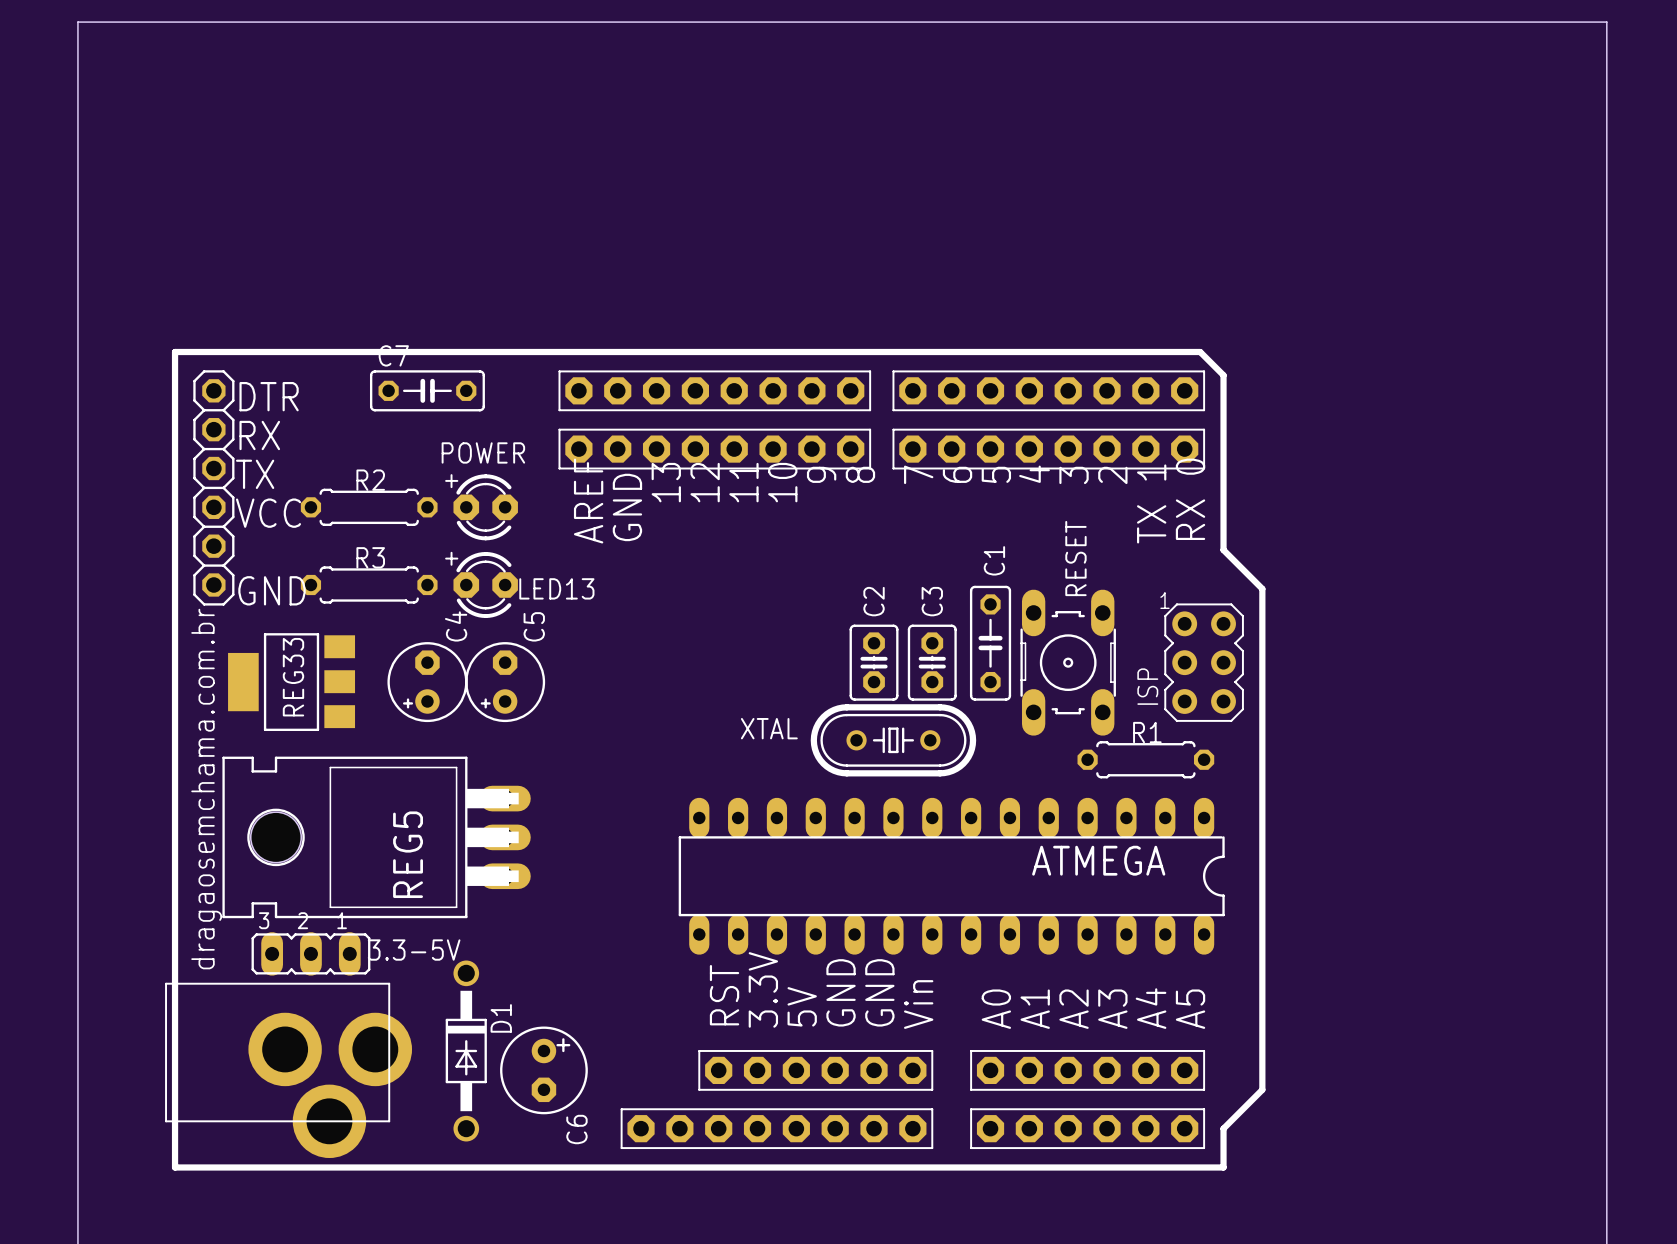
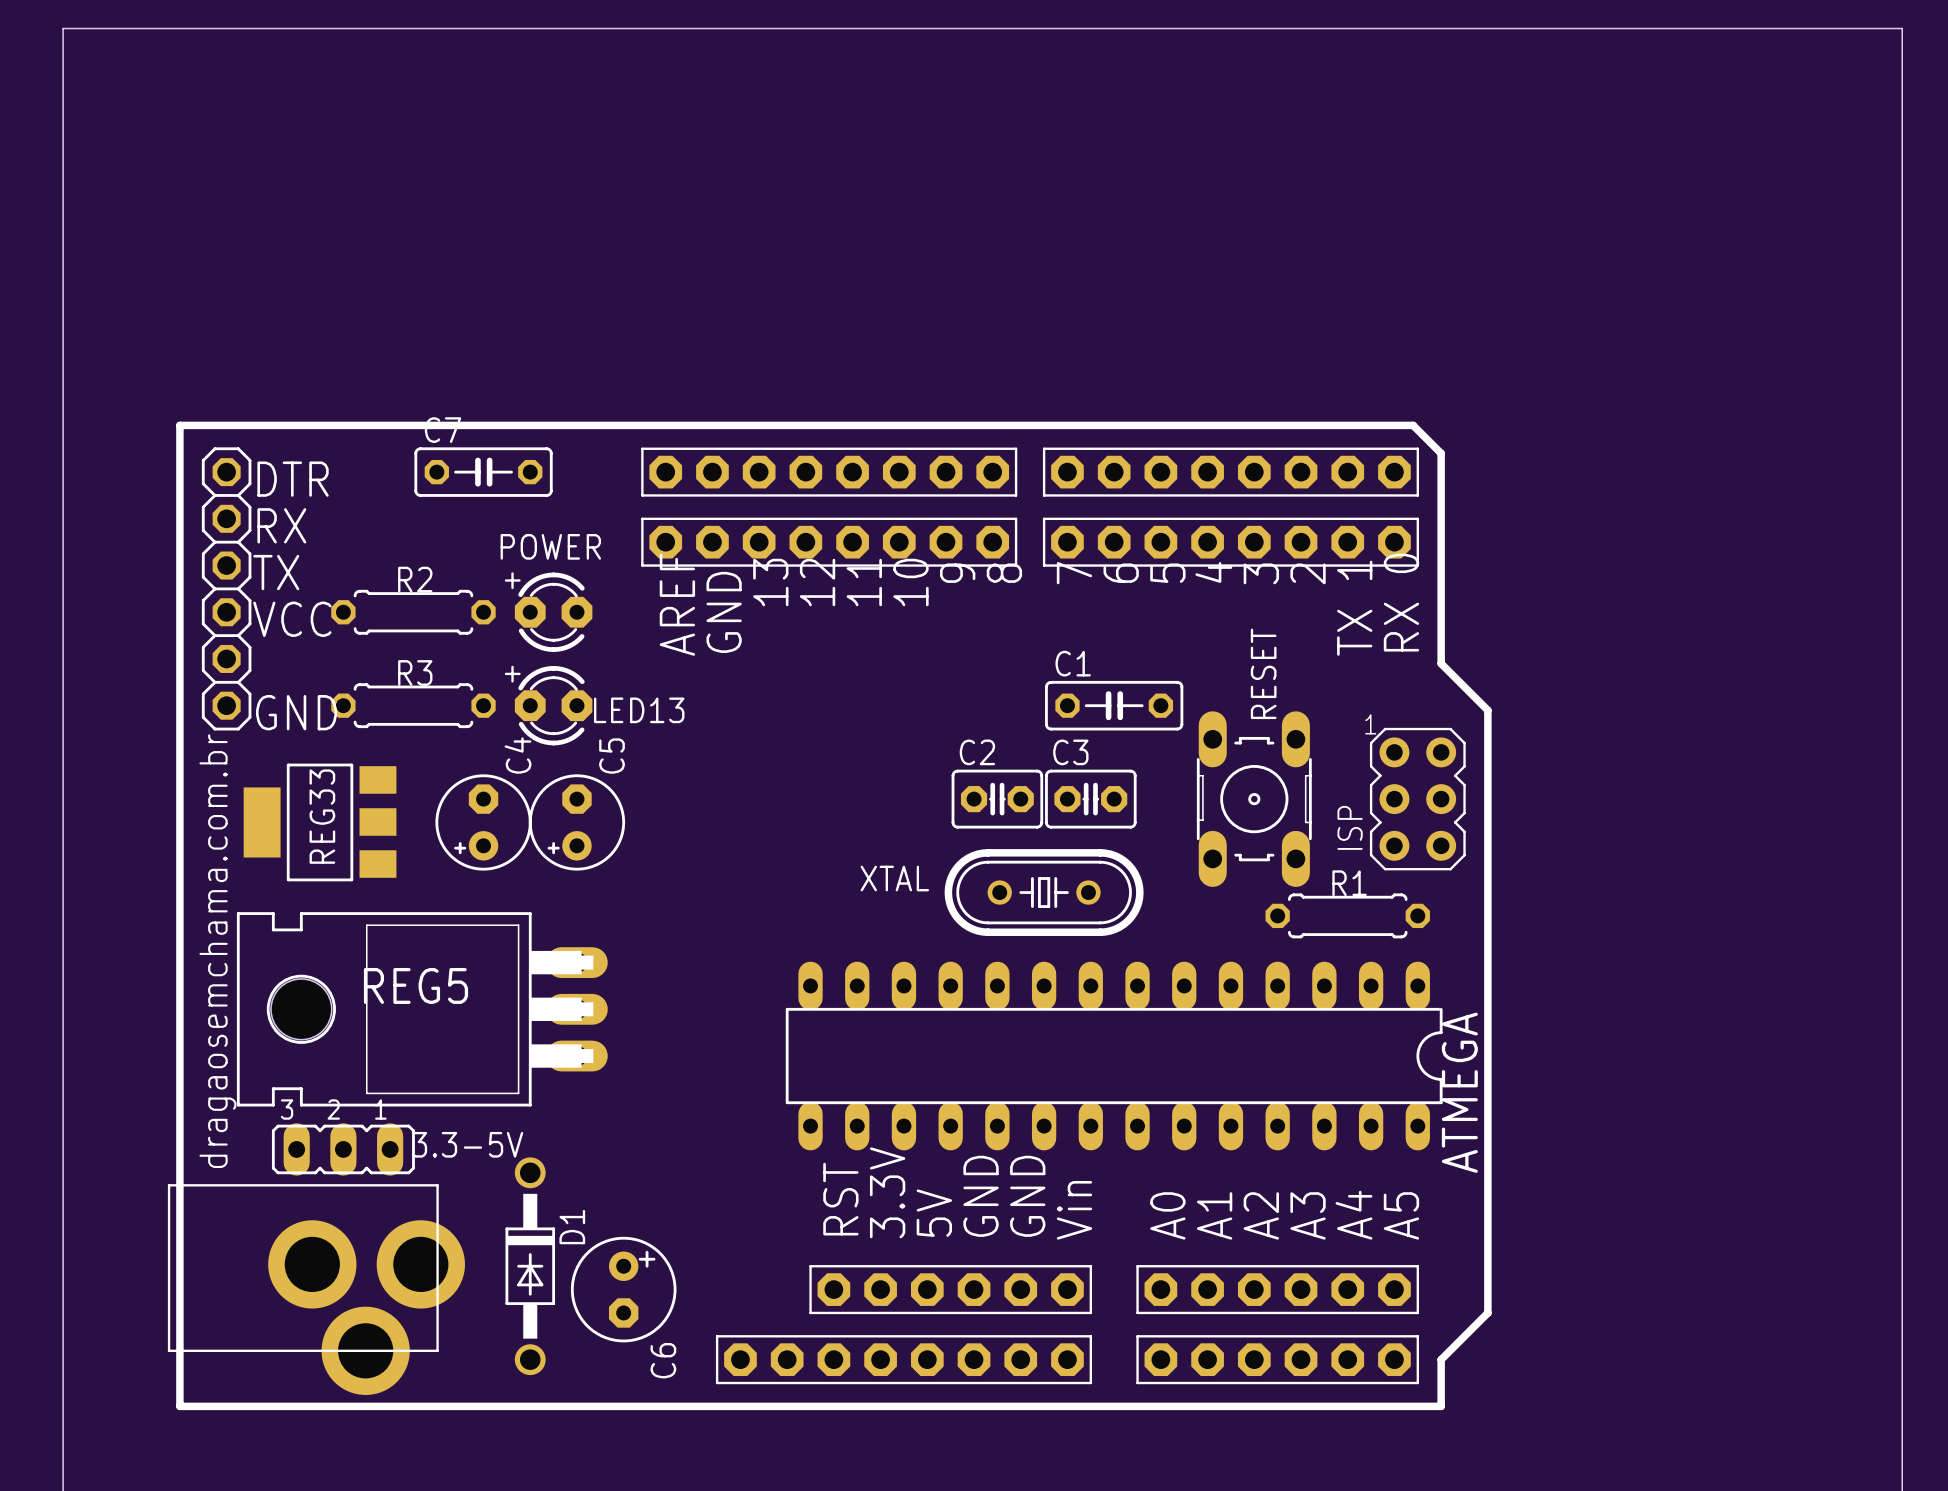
C1 name position: C1 (994, 560) -> C1 (1073, 663)
C1 rotation: 0° (990, 643) -> 90° clockwise (1114, 705)
C1 position: (990, 643) -> (1114, 705)
C2 rotation: 0° (874, 662) -> 90° clockwise (997, 799)
C3 rotation: 0° (932, 662) -> 90° clockwise (1090, 799)
REG5 name rotation: 0° (408, 854) -> 90° clockwise (415, 985)
ATMEGA name rotation: 0° (1098, 860) -> 90° counterclockwise (1459, 1092)

